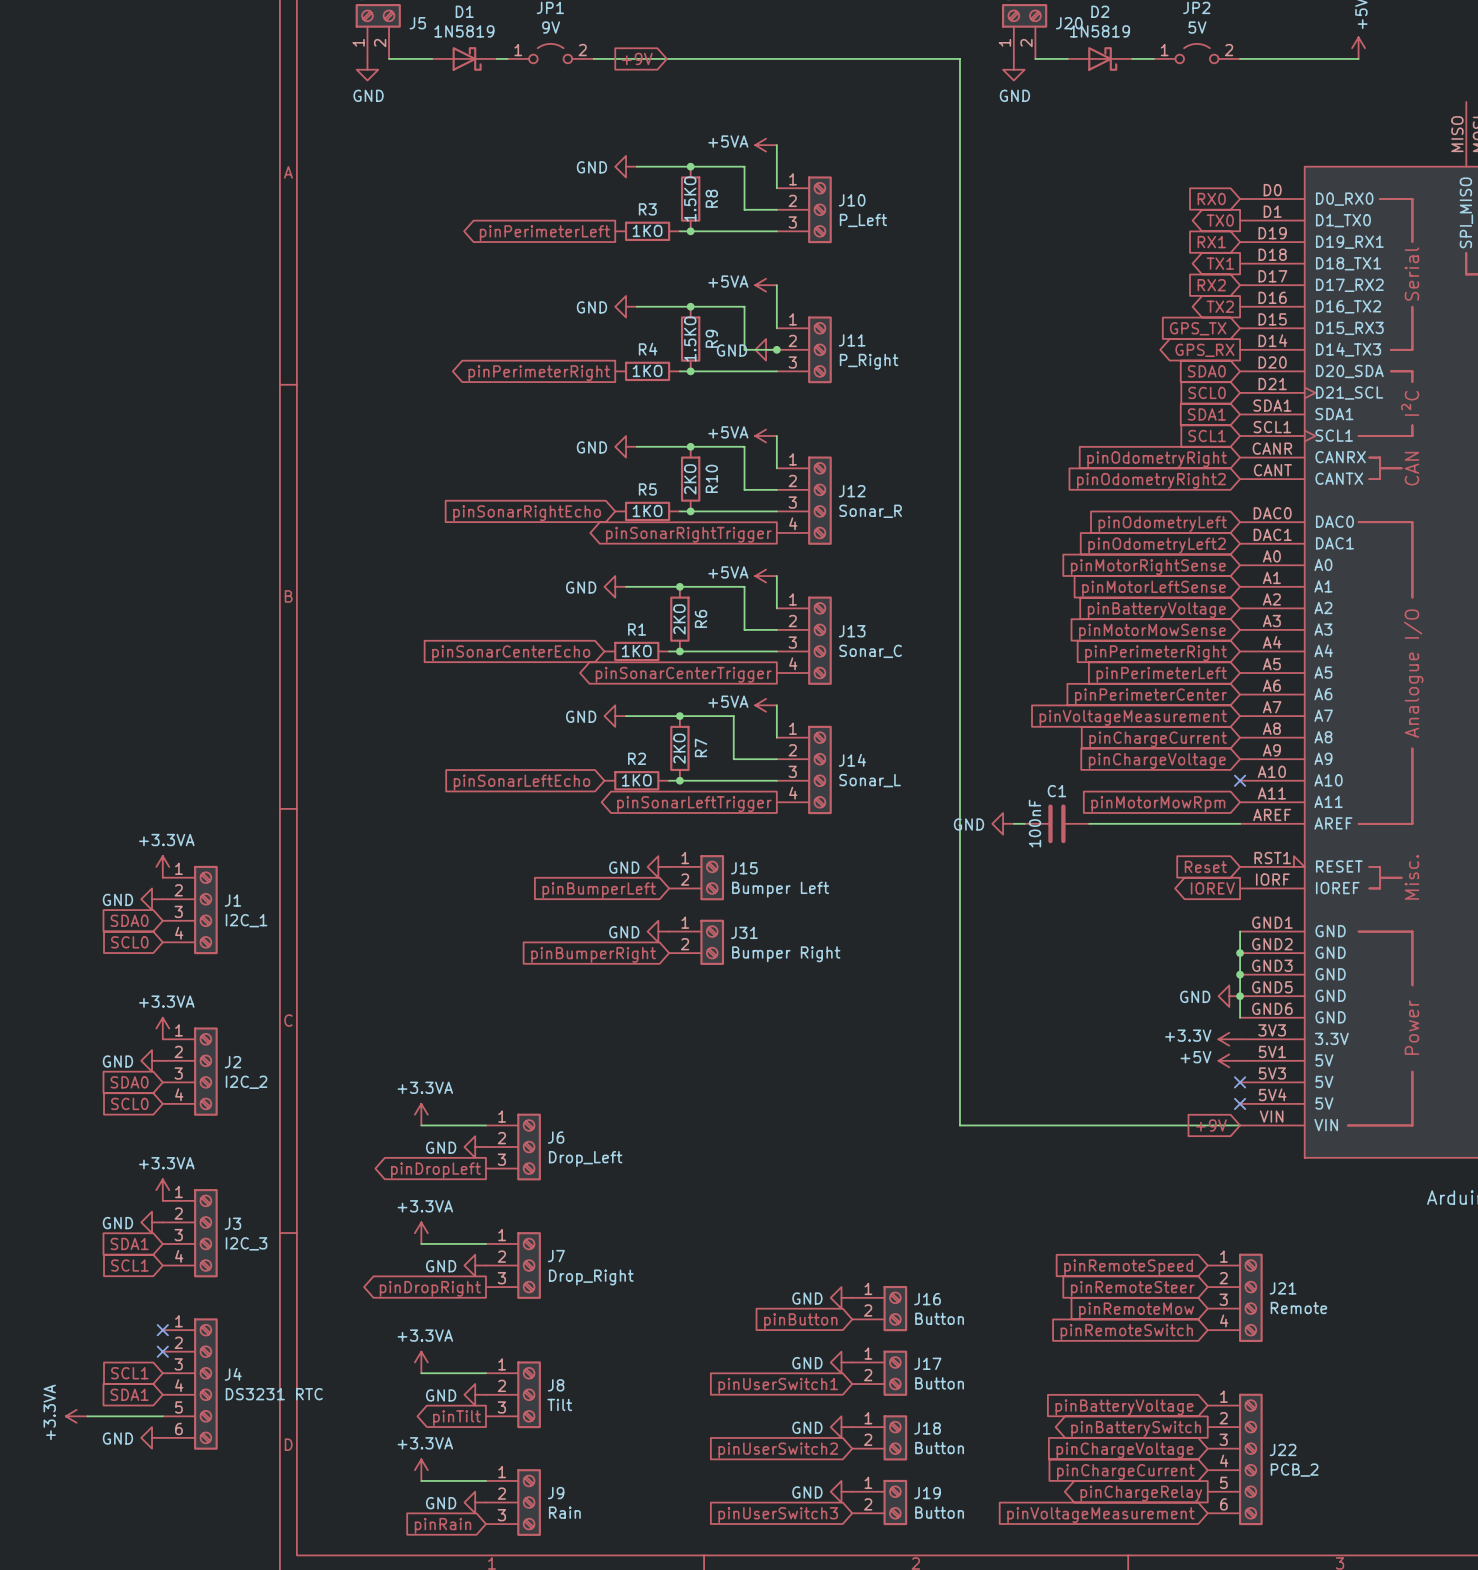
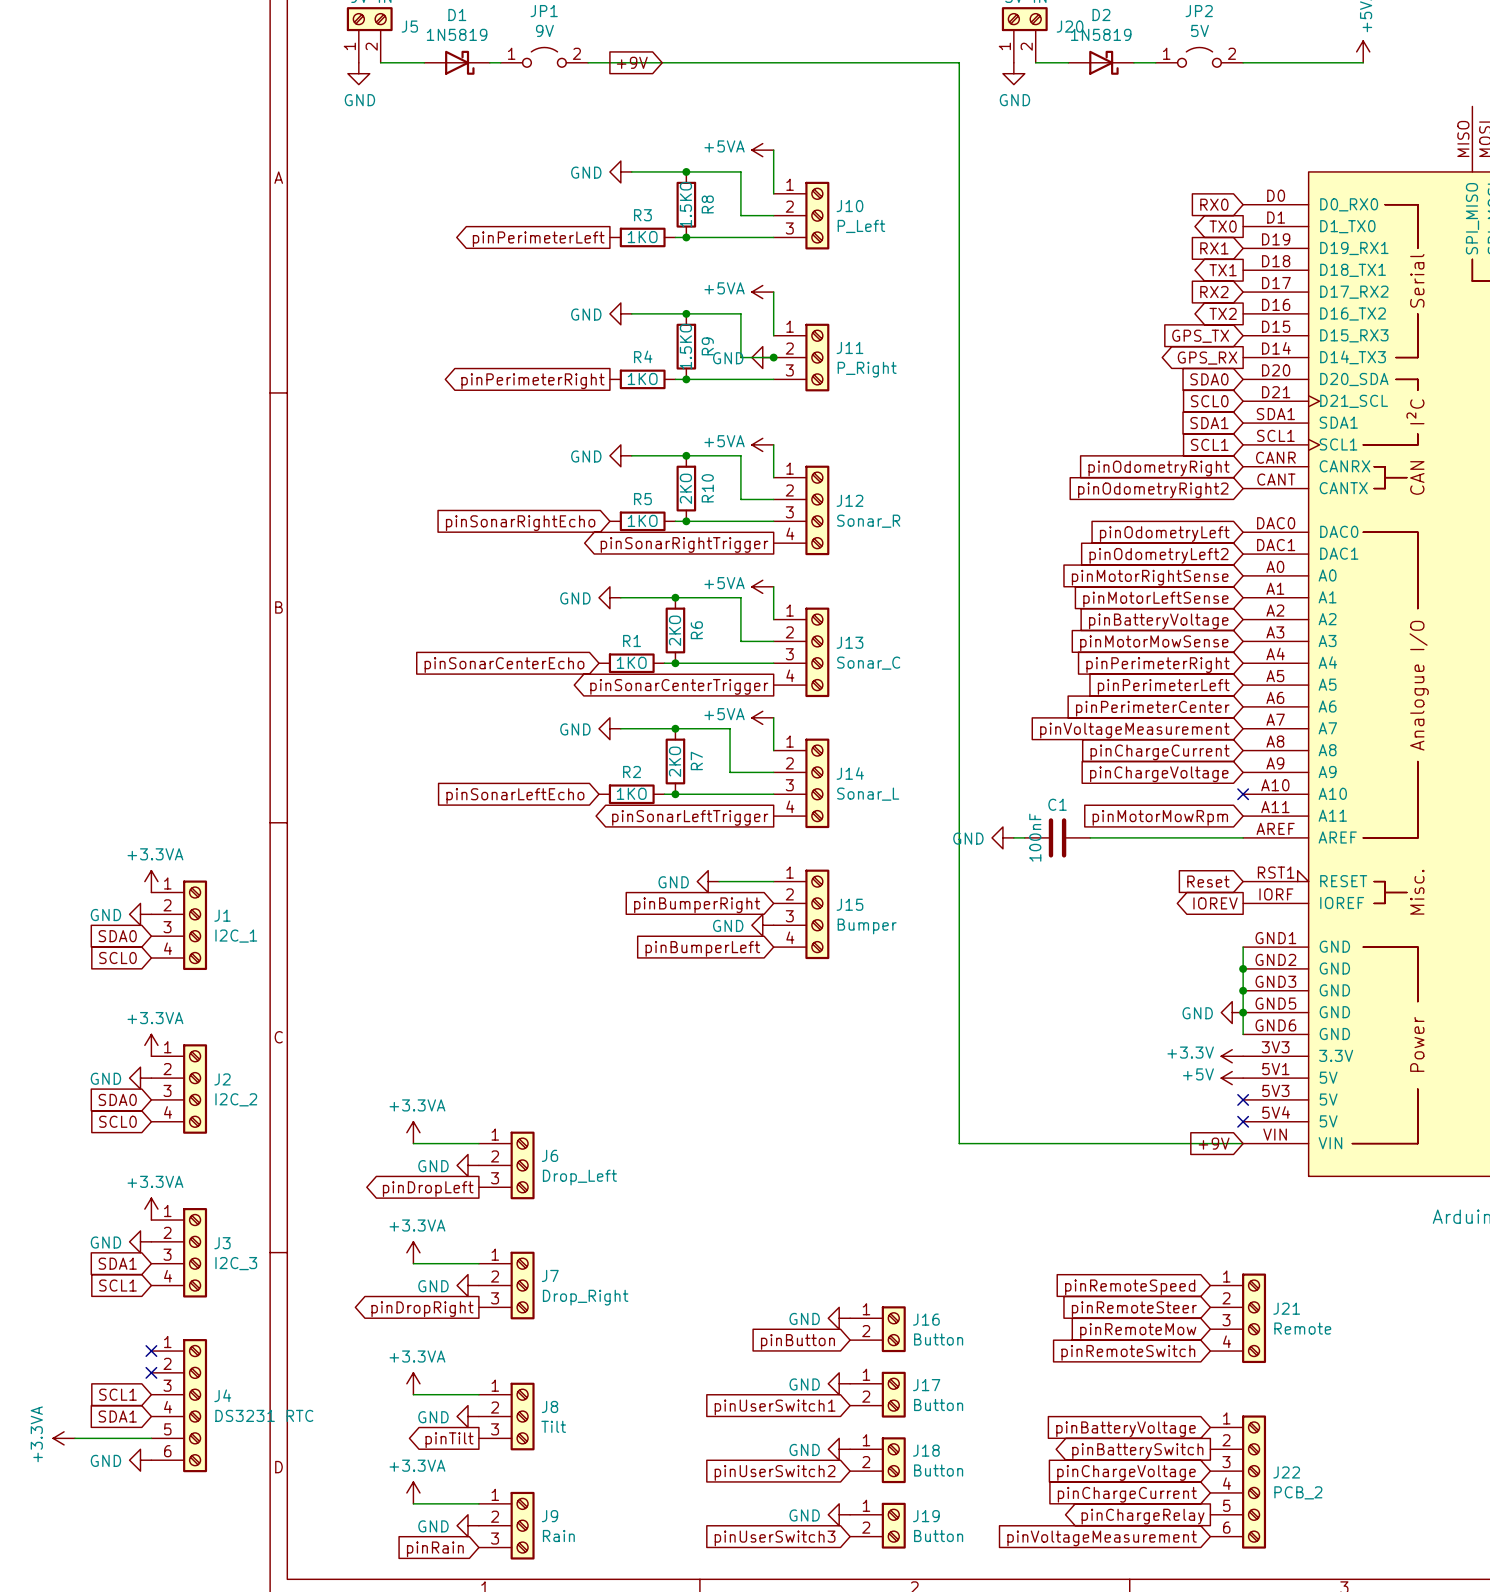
J15 symbol: [669, 855, 725, 901] -> [773, 869, 830, 960]
power symbol: GND (658, 866) -> none
power symbol: none -> GND (708, 881)
wire: none -> (719, 881) (773, 881)
J15 value: Bumper Left (780, 889) -> Bumper (867, 926)
global label position: pinBumperLeft (599, 890) -> pinBumperLeft (702, 948)
power symbol: none -> GND (762, 925)
power symbol: GND (658, 931) -> none
J31: Bumper Right (696, 942) -> none
global label position: pinBumperRight (593, 954) -> pinBumperRight (697, 905)

